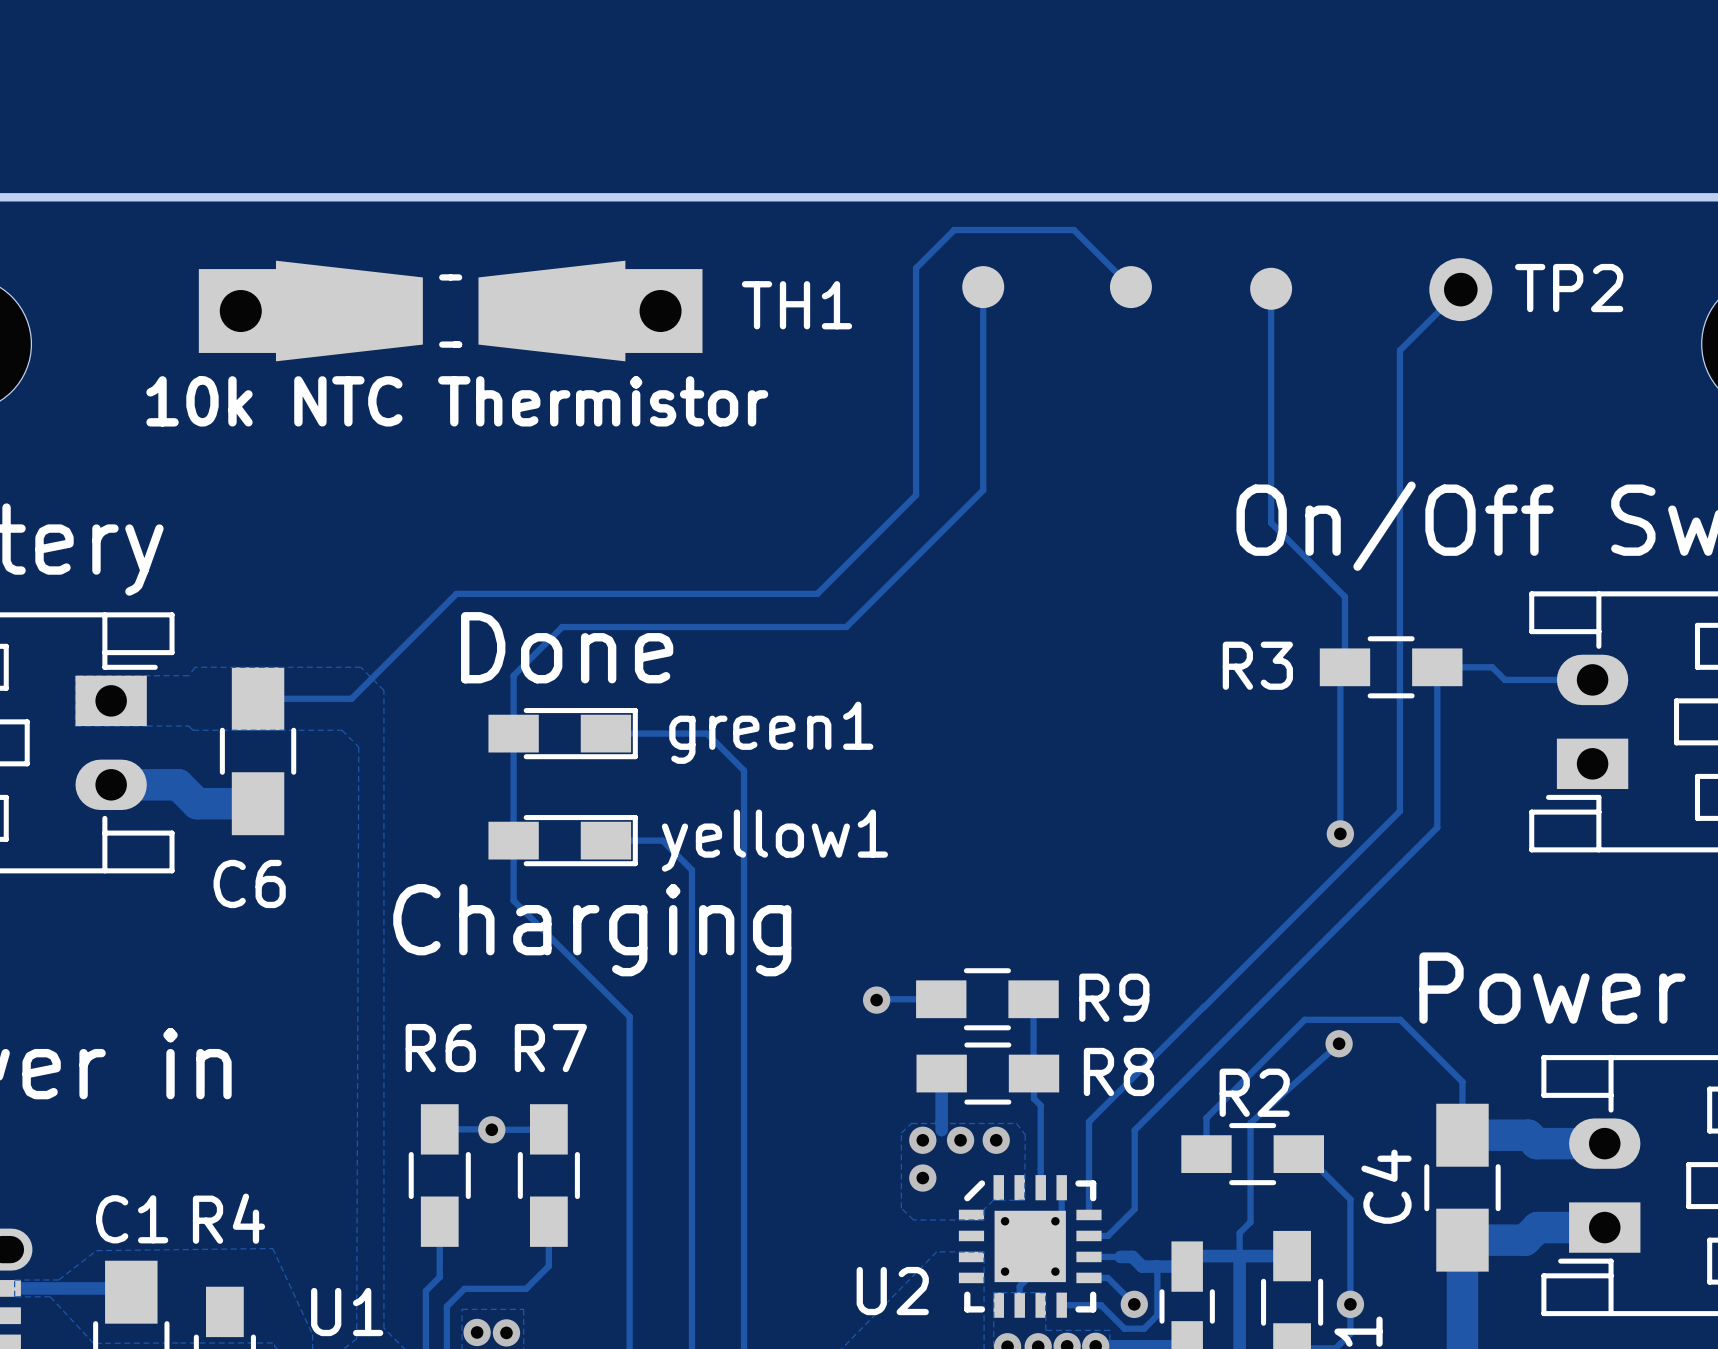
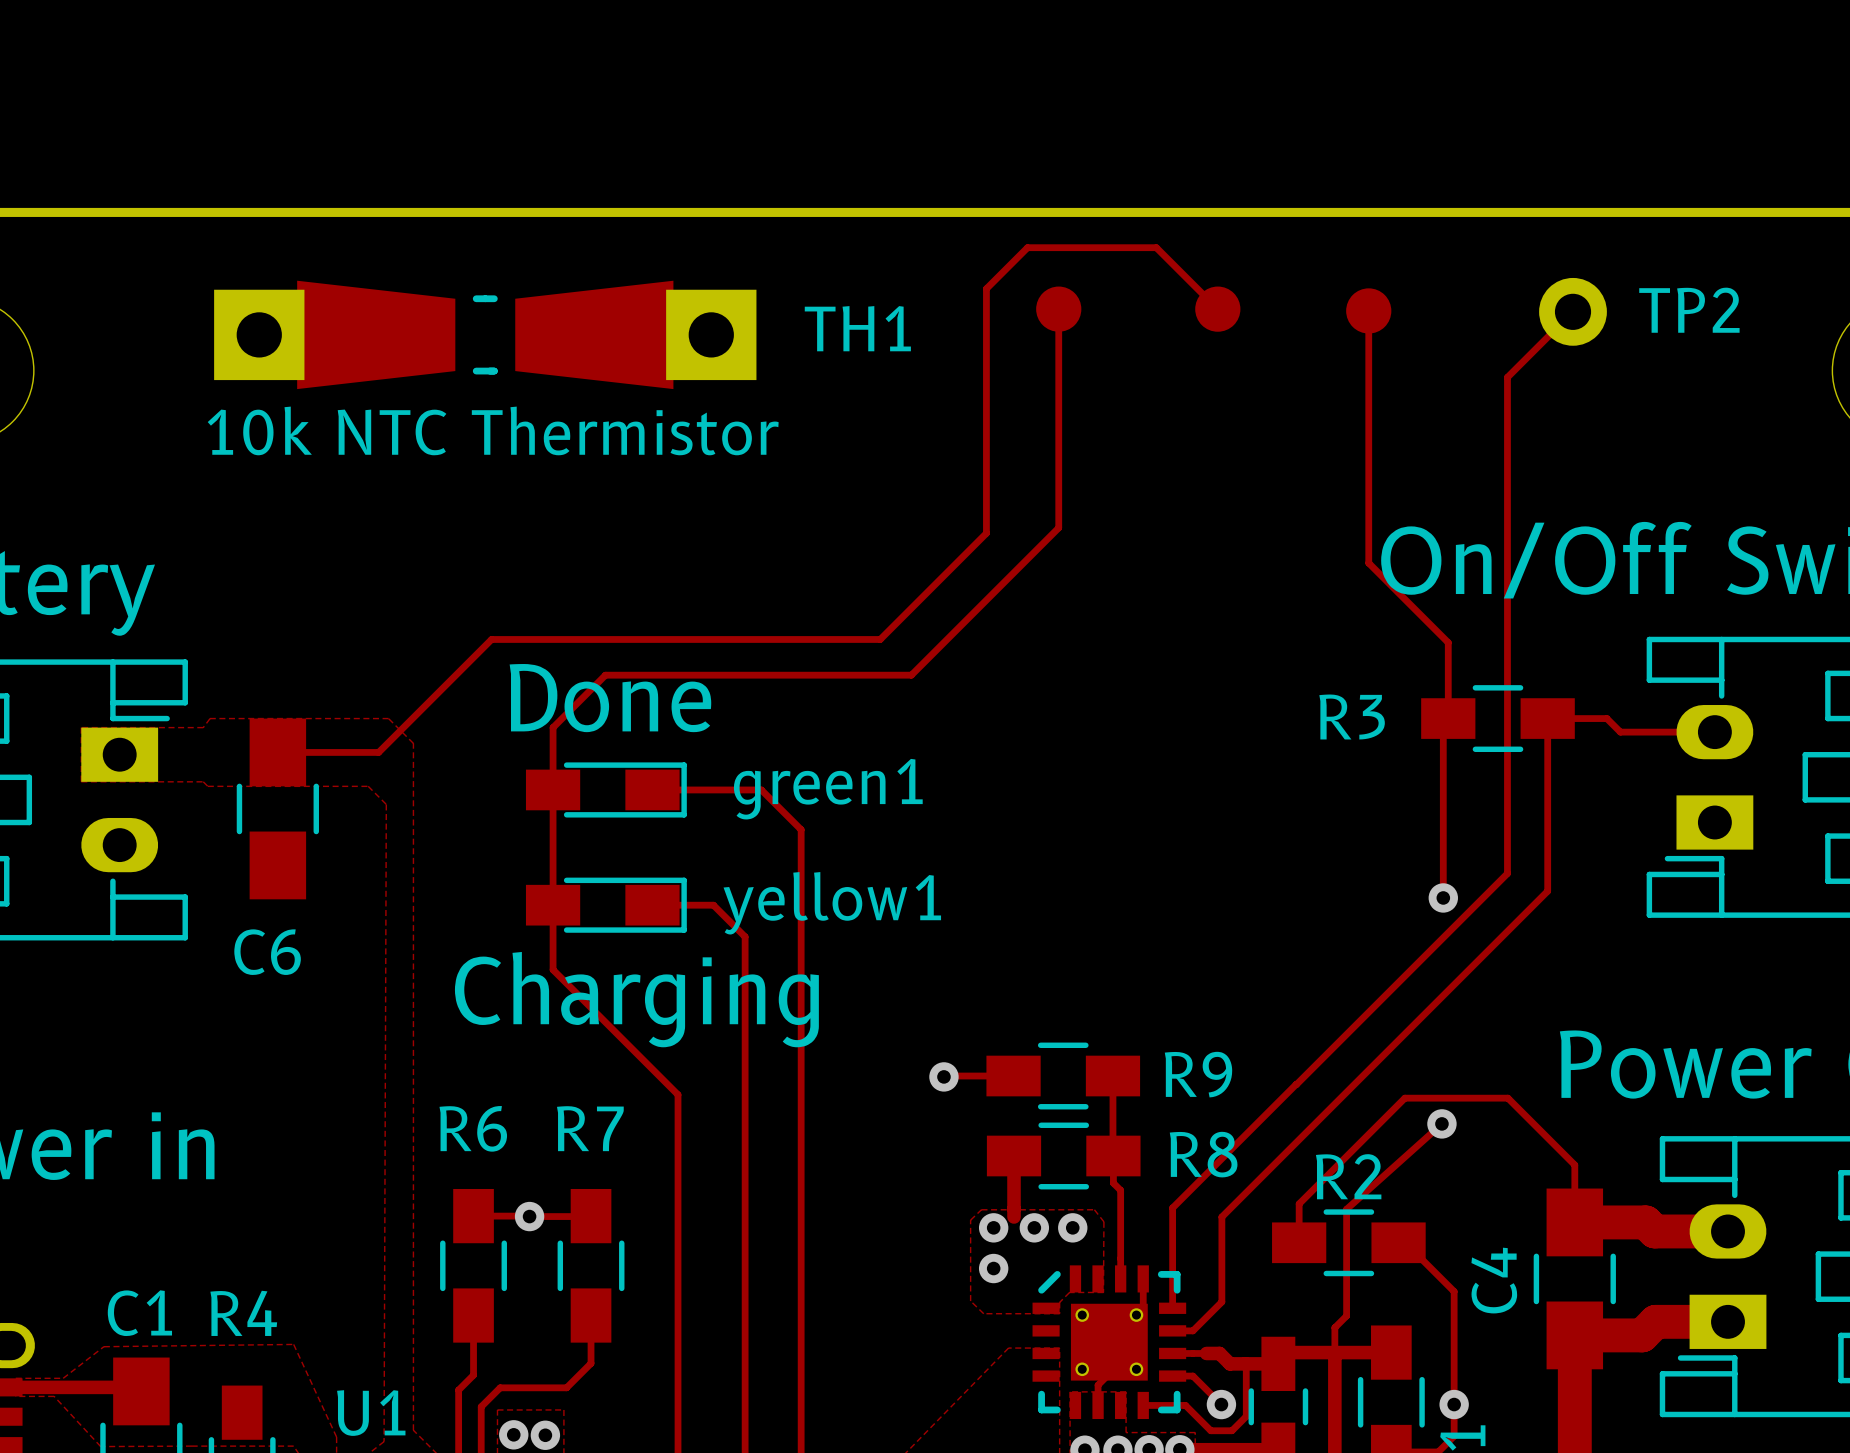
track: (111, 784) (178, 784) (197, 803) (258, 803) -> none
U2 name: U2 (892, 1291) -> none

